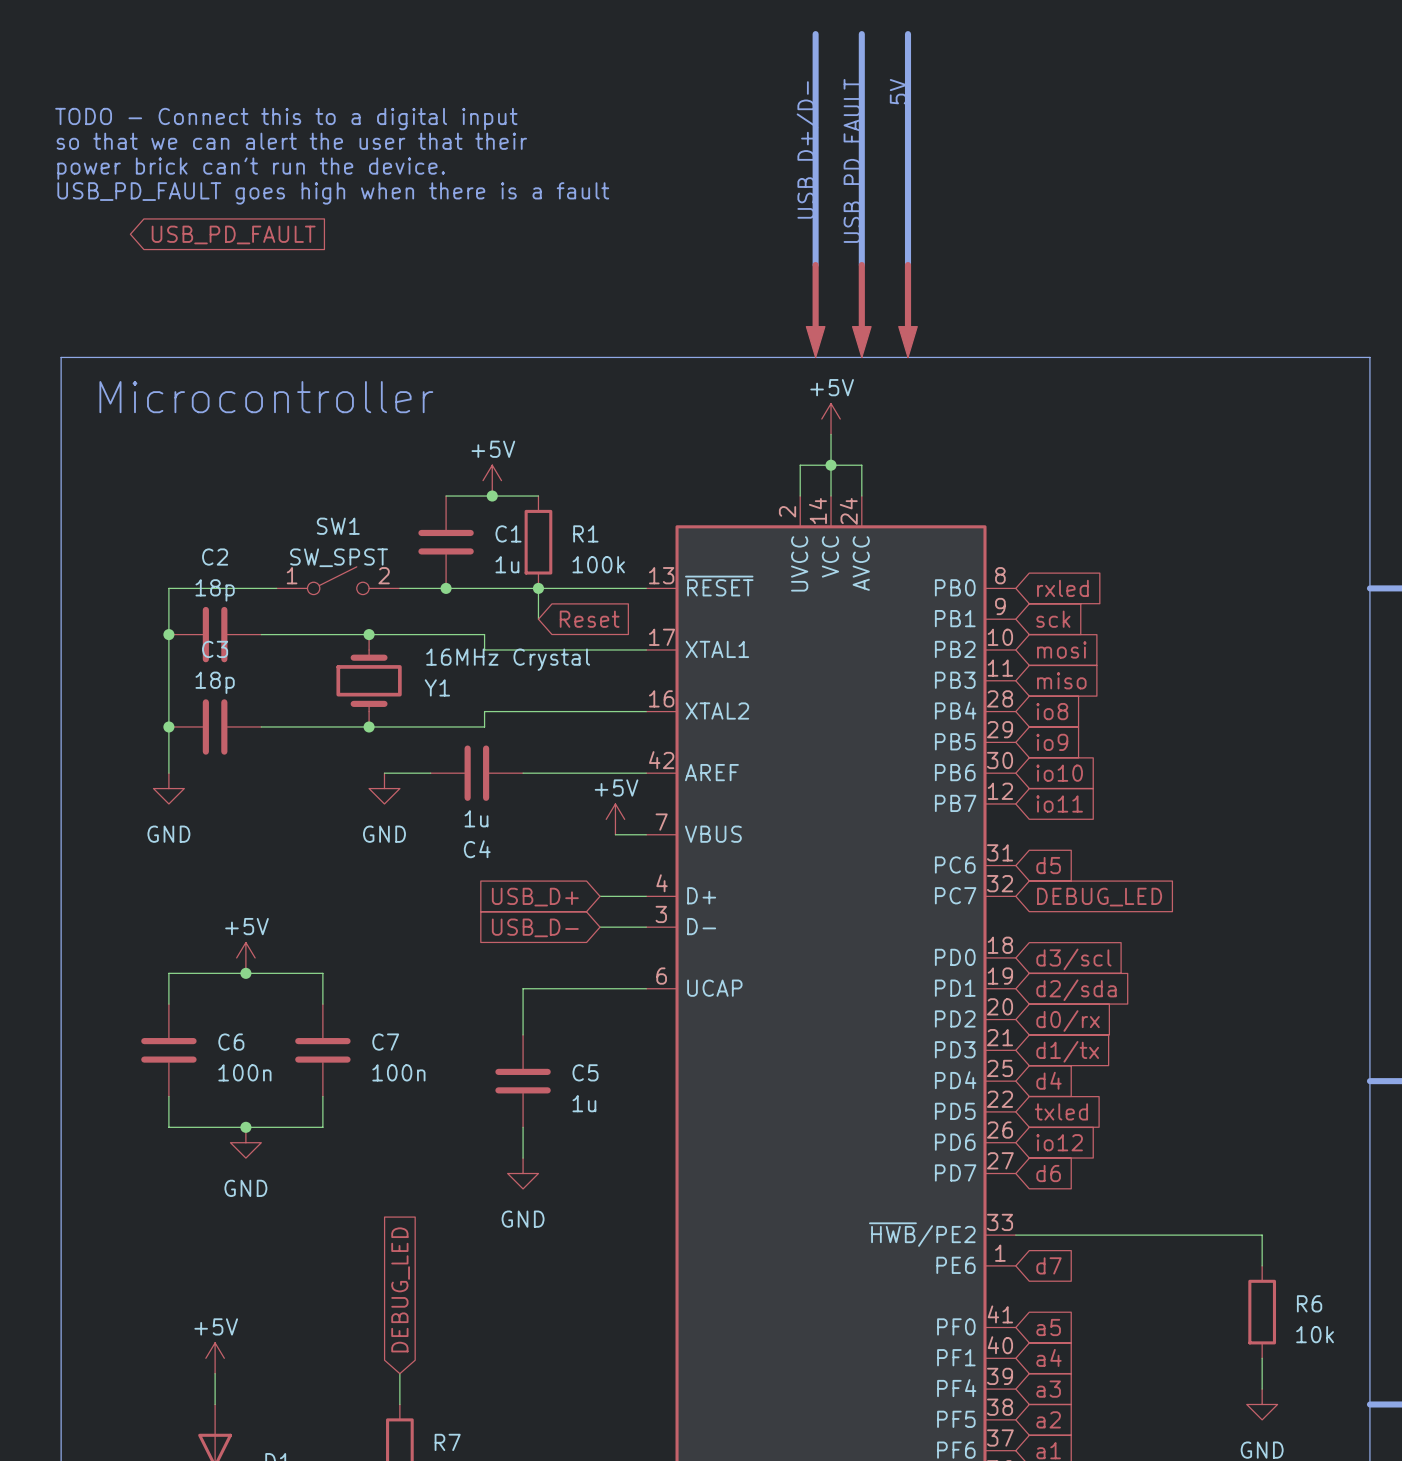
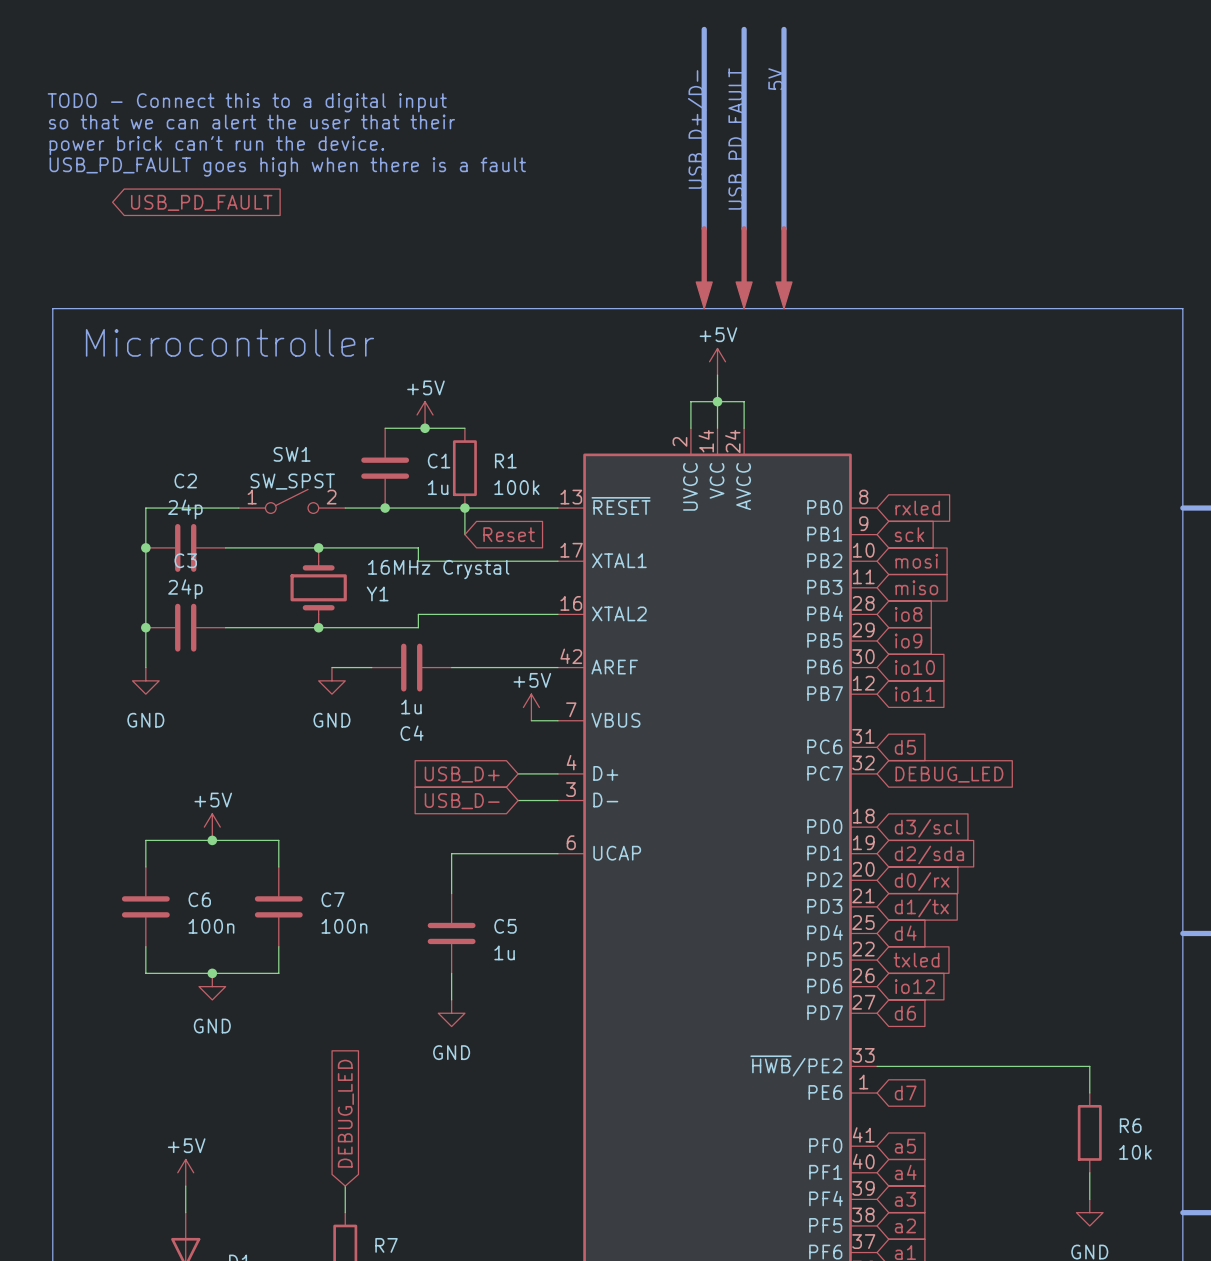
C2 value: 18p (215, 590) -> 24p (185, 509)
C3 value: 18p (215, 682) -> 24p (185, 589)

